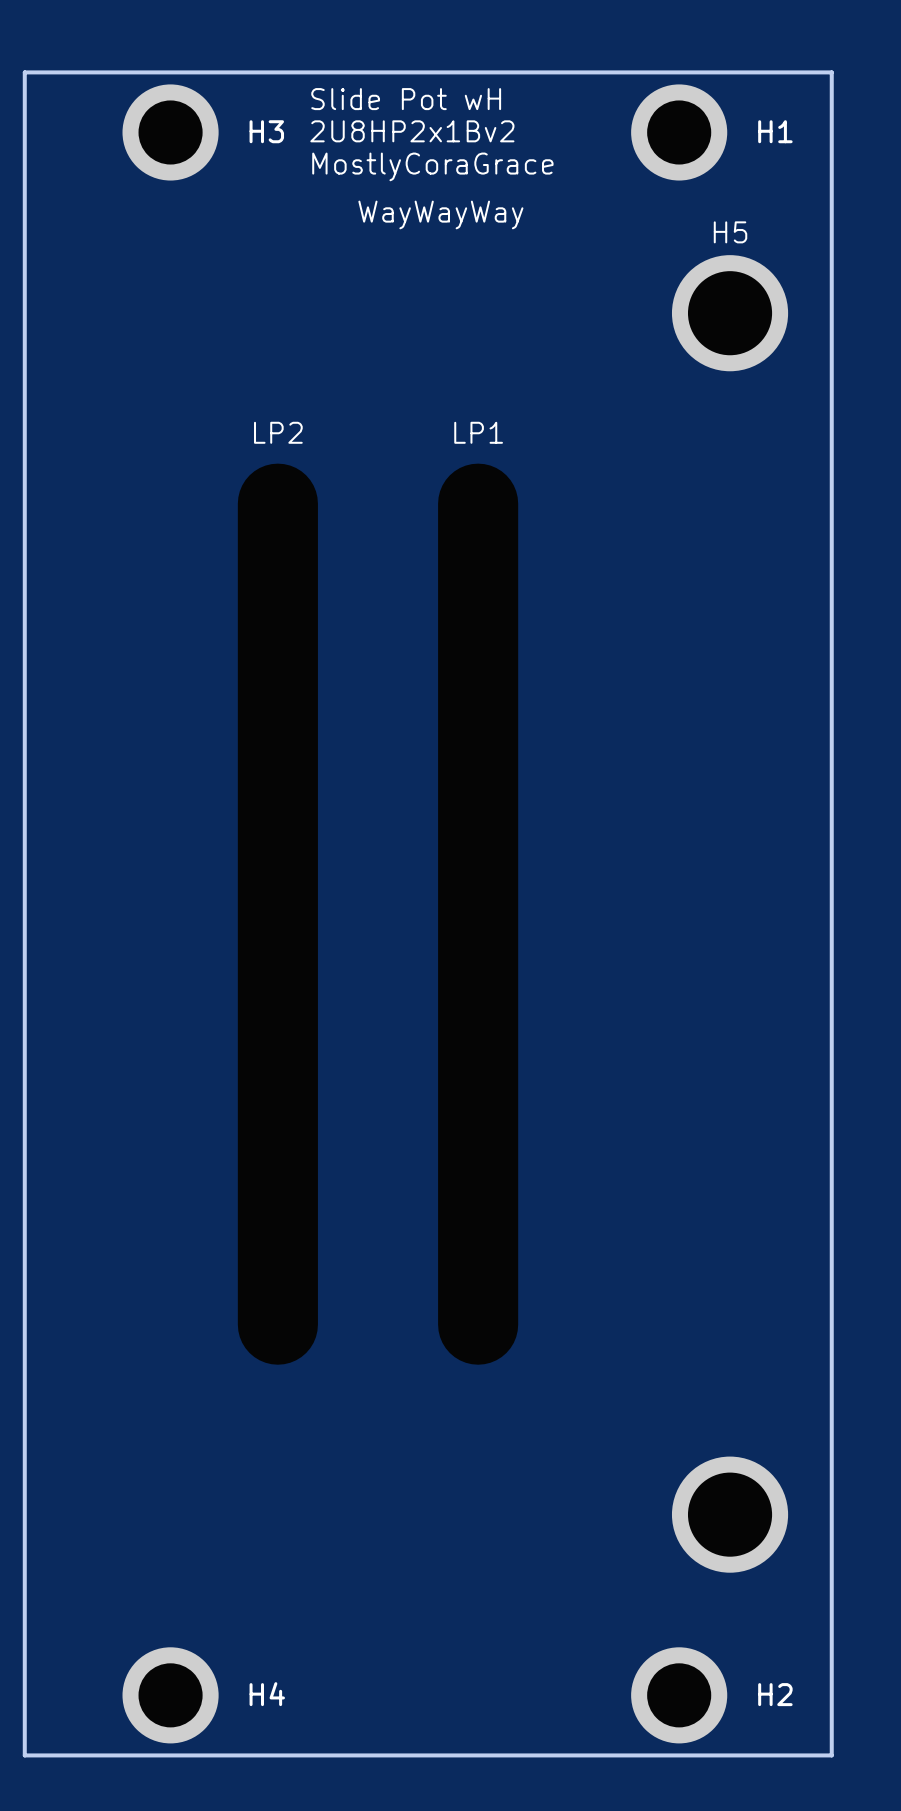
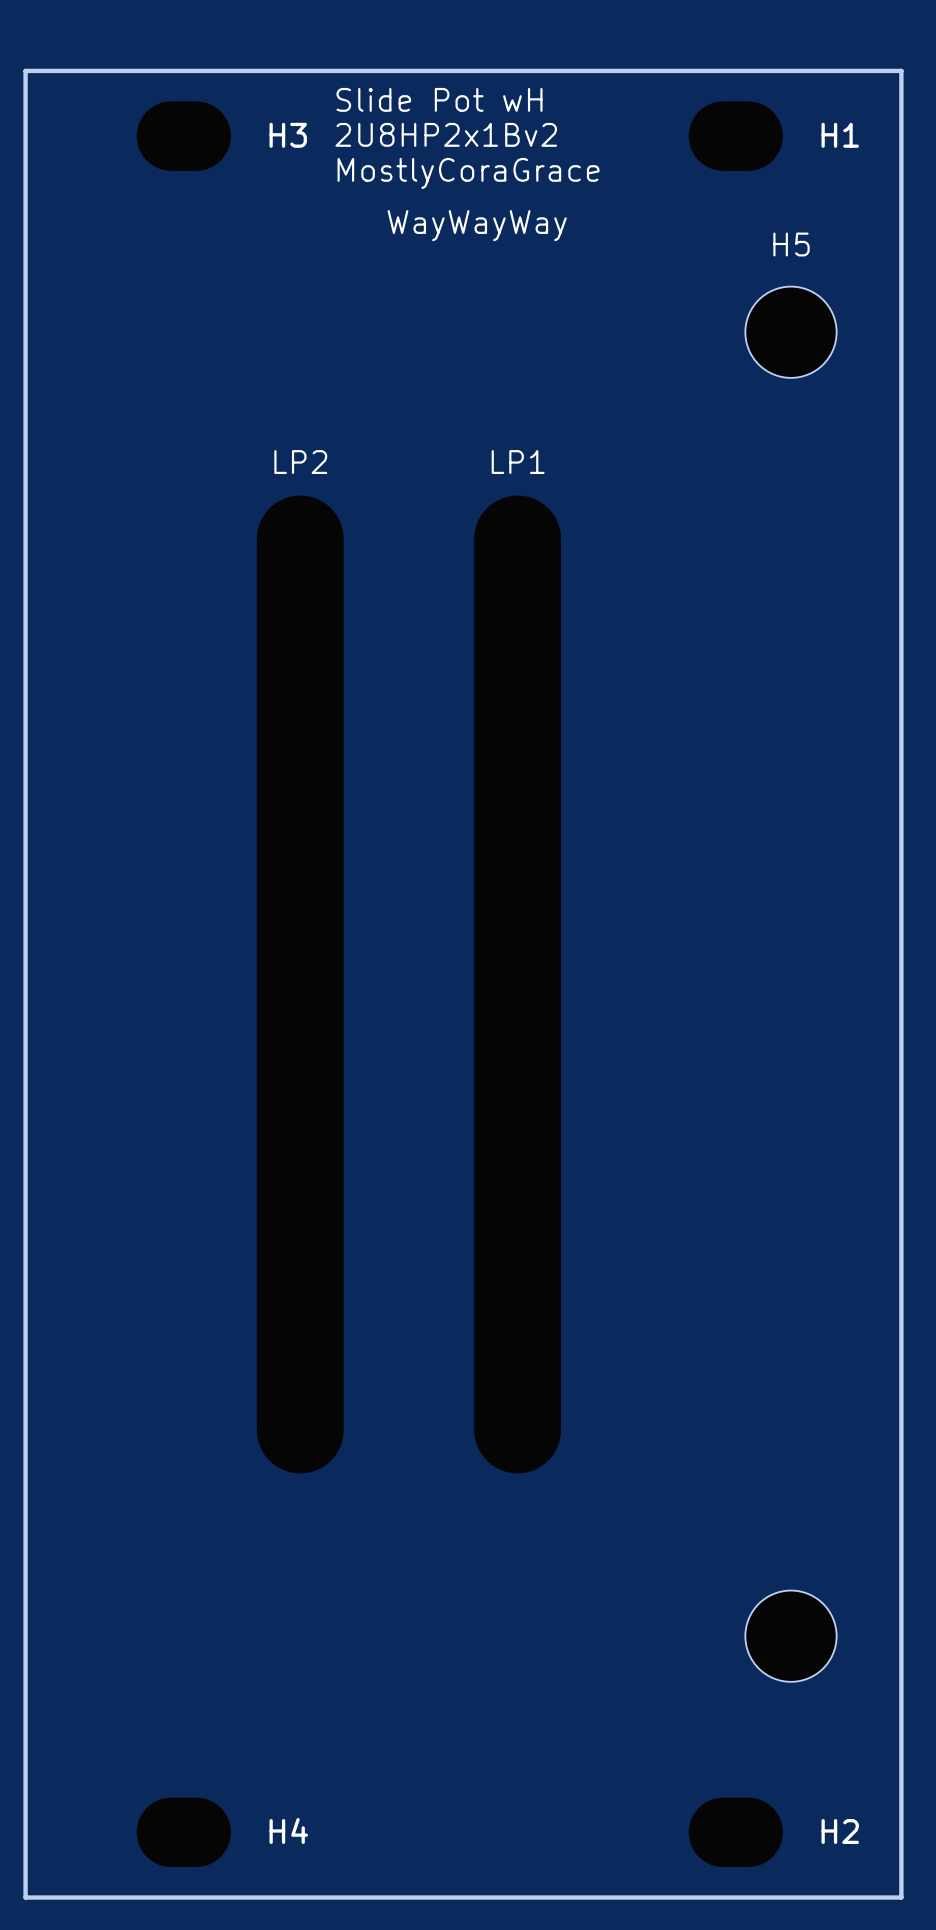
H3 footprint: [122, 84, 219, 181] -> [136, 101, 231, 171]
H1 footprint: [631, 84, 728, 181] -> [688, 101, 783, 171]
H5 footprint: [671, 255, 789, 1573] -> [745, 286, 837, 1682]
H4 footprint: [122, 1647, 219, 1744] -> [136, 1797, 231, 1868]
H2 footprint: [631, 1647, 728, 1744] -> [688, 1797, 783, 1868]

